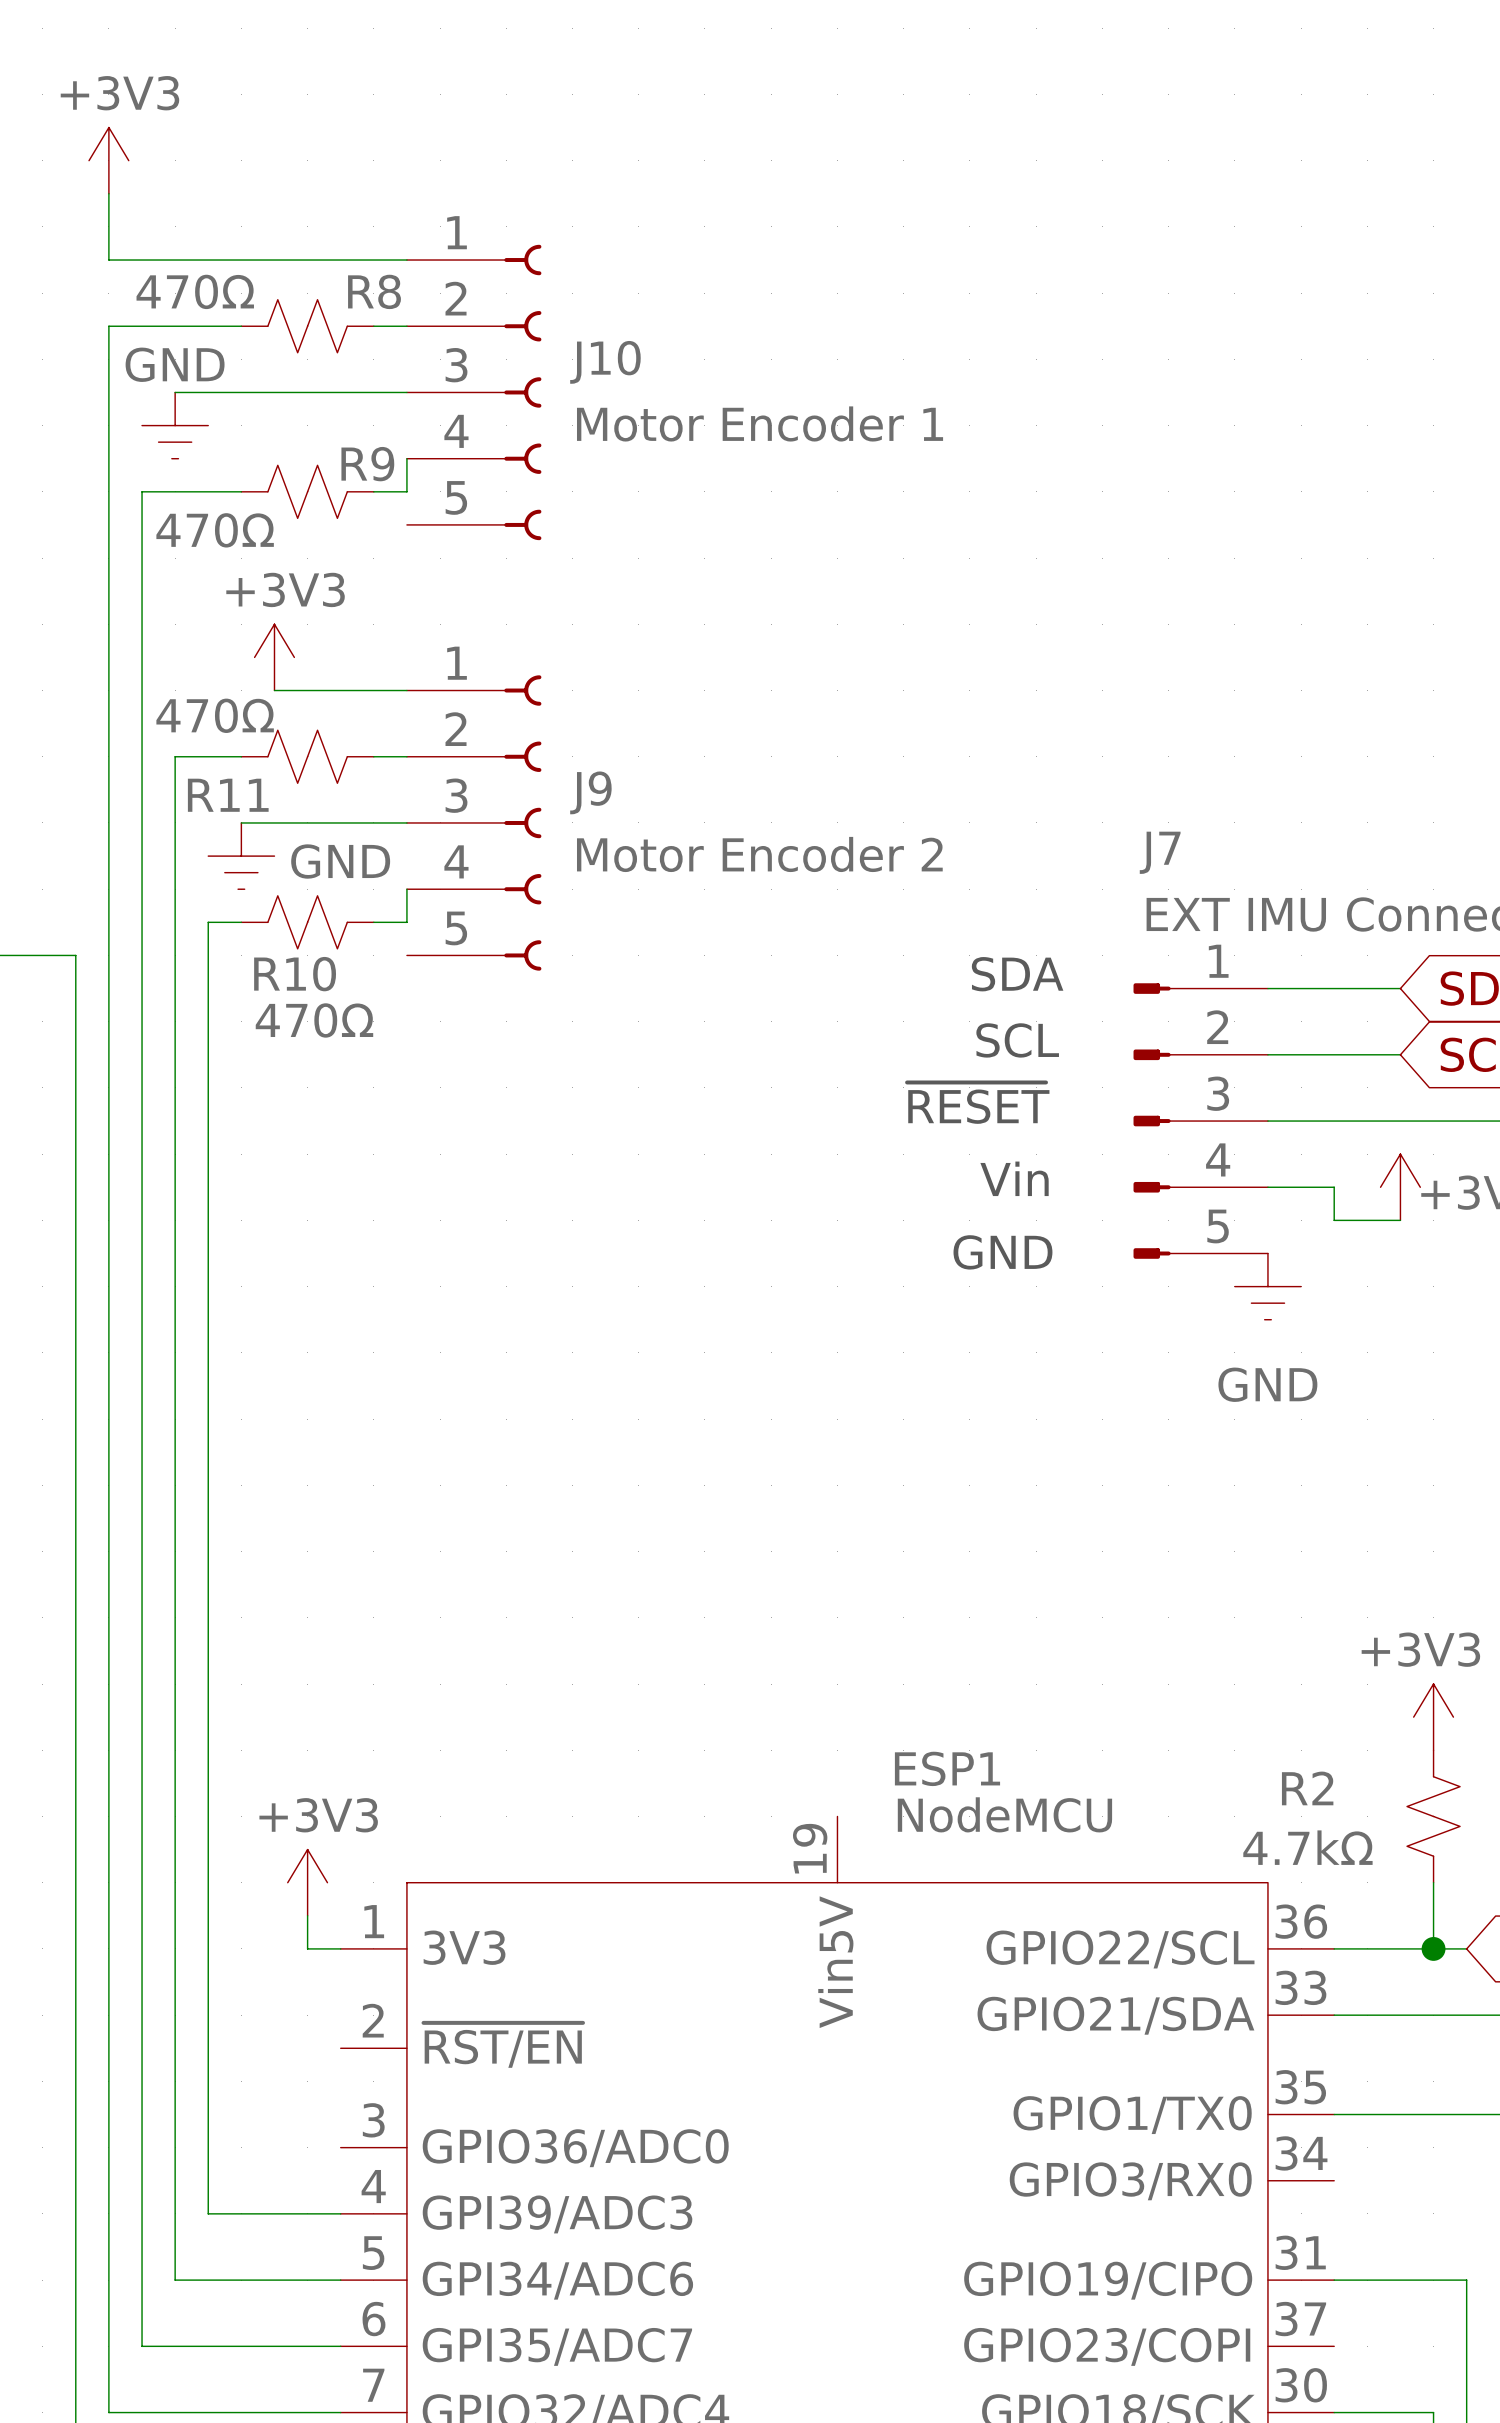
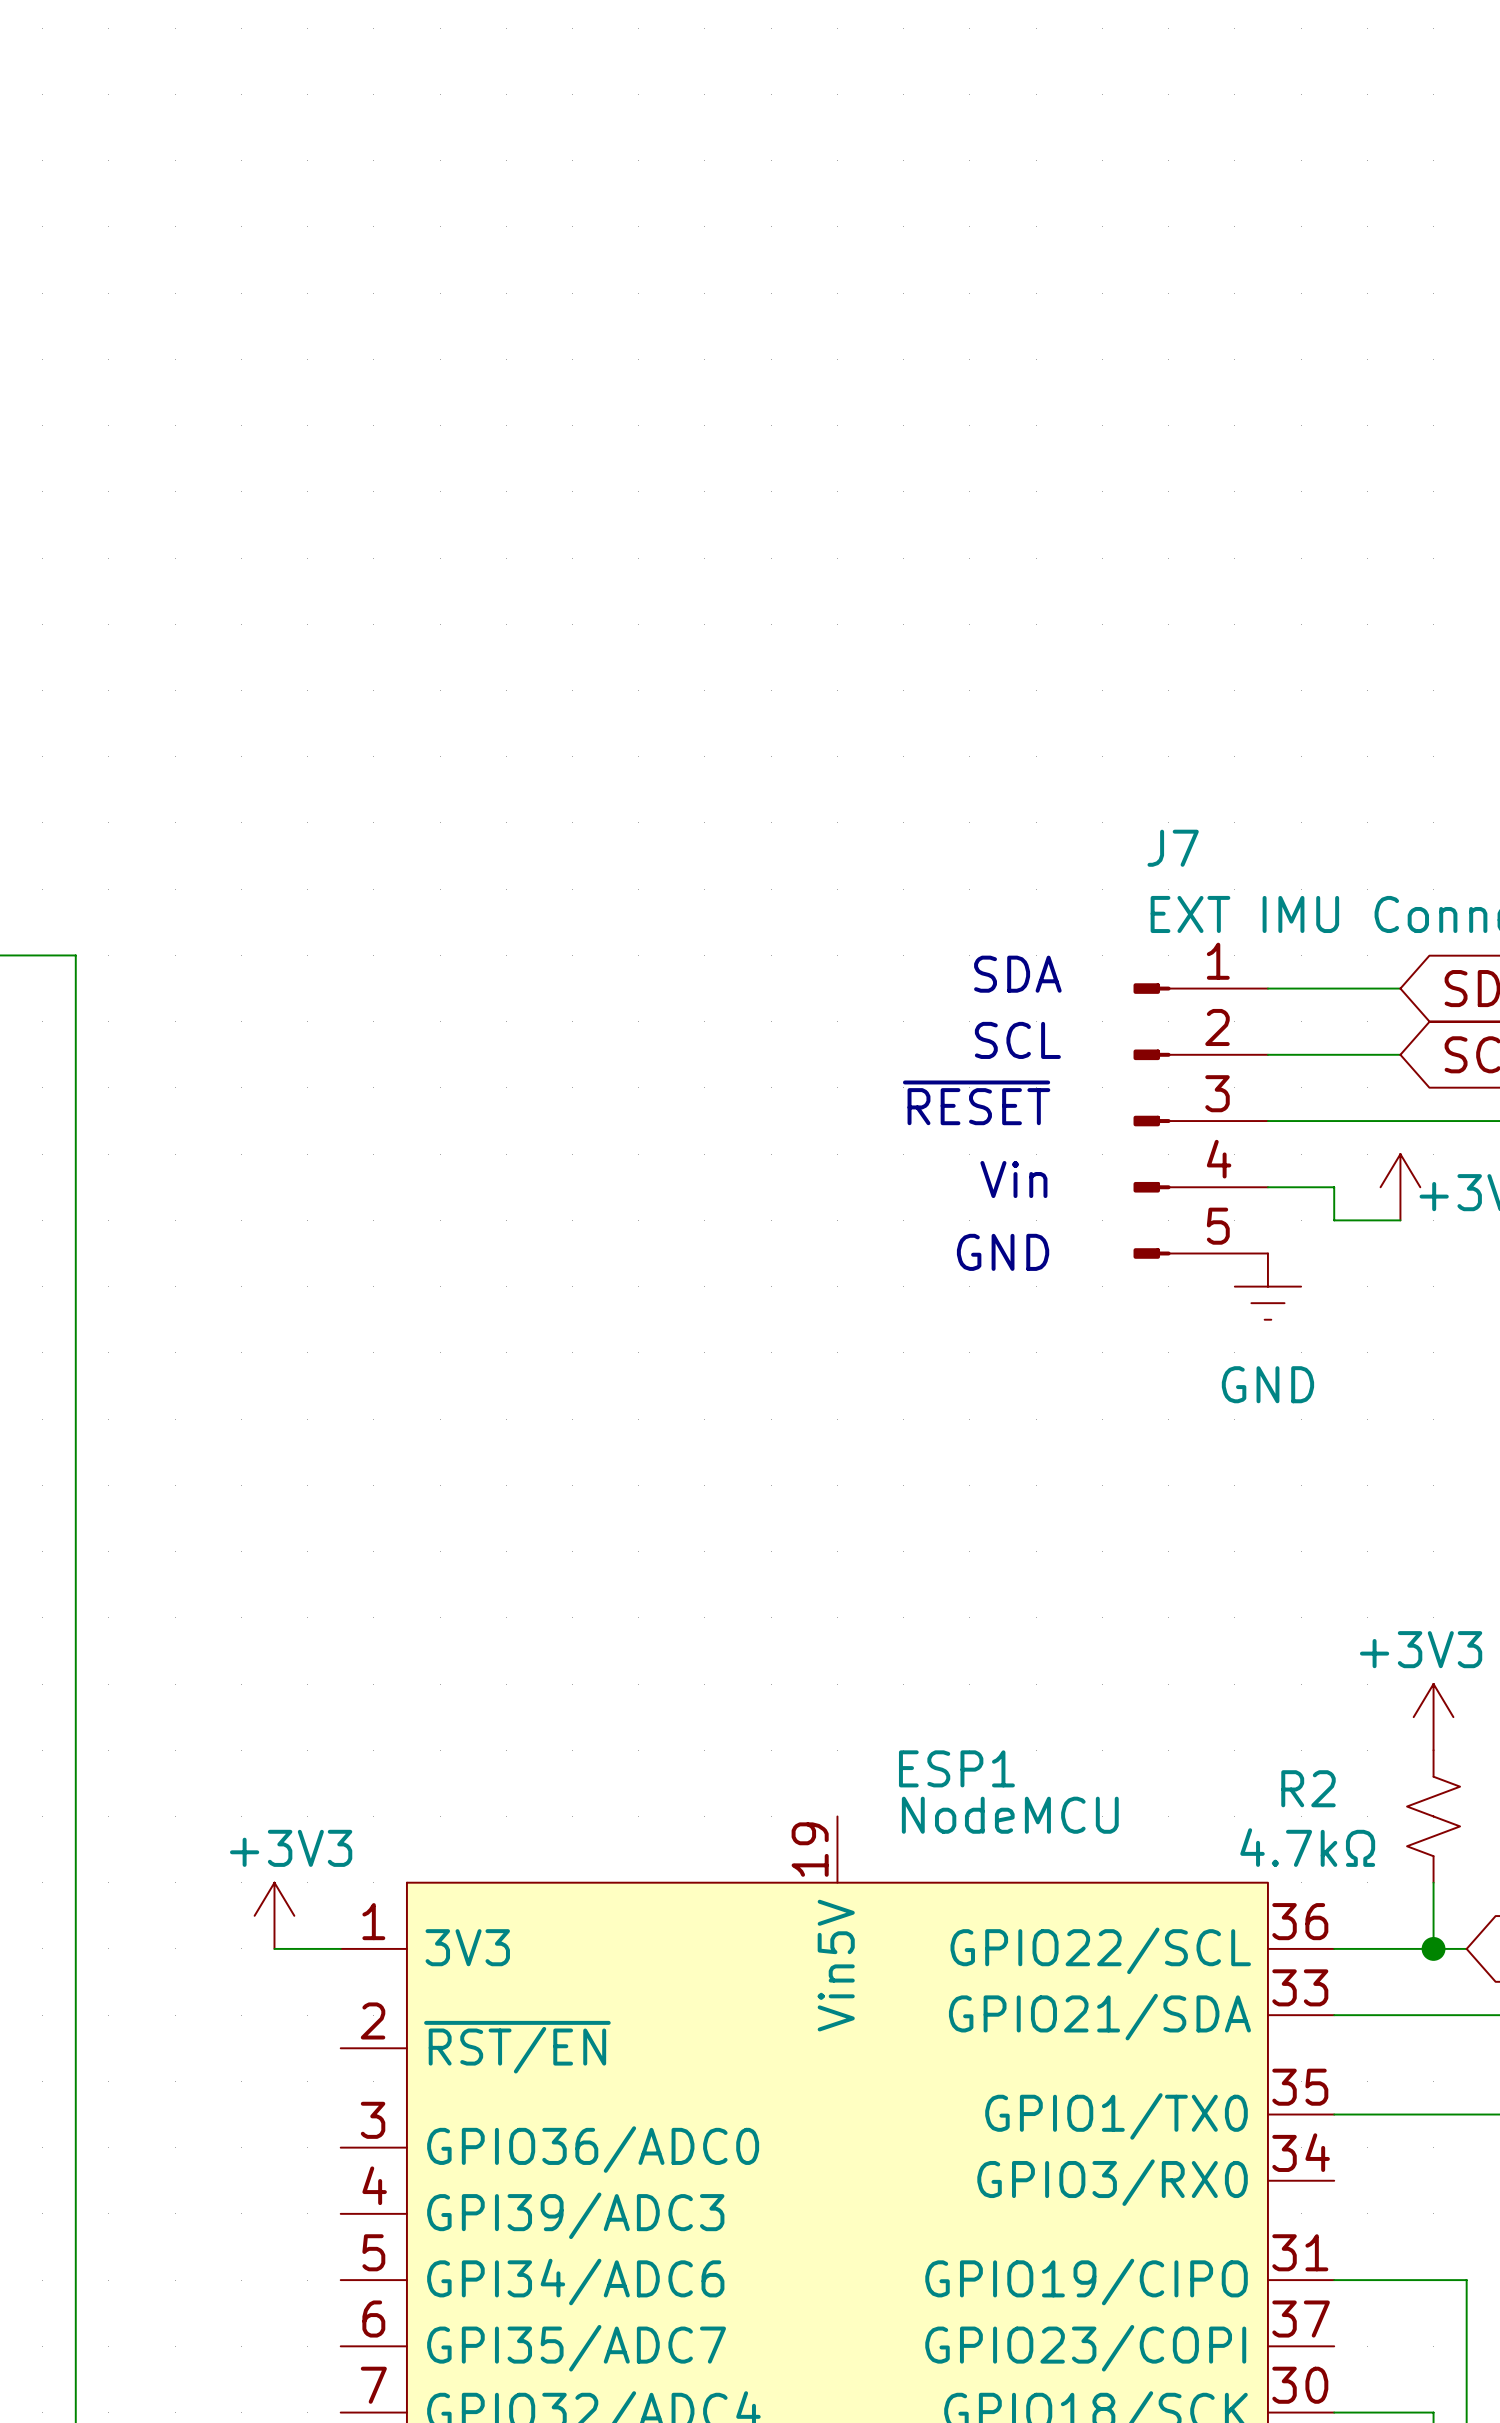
power symbol: +3V3 (108, 160) -> none
wire: (108, 193) (108, 260) (406, 260) -> none
wire: (241, 326) (108, 326) (108, 2412) (340, 2412) -> none
R8: 470Ω (307, 326) -> none
wire: (373, 326) (406, 326) -> none
wire: (175, 392) (406, 392) -> none
J10: Motor Encoder 1 (474, 392) -> none
power symbol: GND (175, 425) -> none
wire: (406, 458) (406, 491) (373, 491) -> none
wire: (241, 491) (142, 491) (142, 2346) (340, 2346) -> none
R9: 470Ω (307, 491) -> none
power symbol: +3V3 (274, 657) -> none
wire: (274, 690) (406, 690) -> none
wire: (241, 756) (175, 756) (175, 2280) (340, 2280) -> none
R11: 470Ω (307, 756) -> none
wire: (373, 756) (406, 756) -> none
wire: (241, 822) (406, 822) -> none
J9: Motor Encoder 2 (474, 822) -> none
power symbol: GND (241, 856) -> none
wire: (406, 889) (406, 922) (373, 922) -> none
wire: (241, 922) (208, 922) (208, 2213) (340, 2213) -> none
R10: 470Ω (307, 922) -> none
power symbol position: +3V3 (307, 1882) -> +3V3 (274, 1915)
wire: (307, 1915) (307, 1948) -> (274, 1948) (307, 1948)

